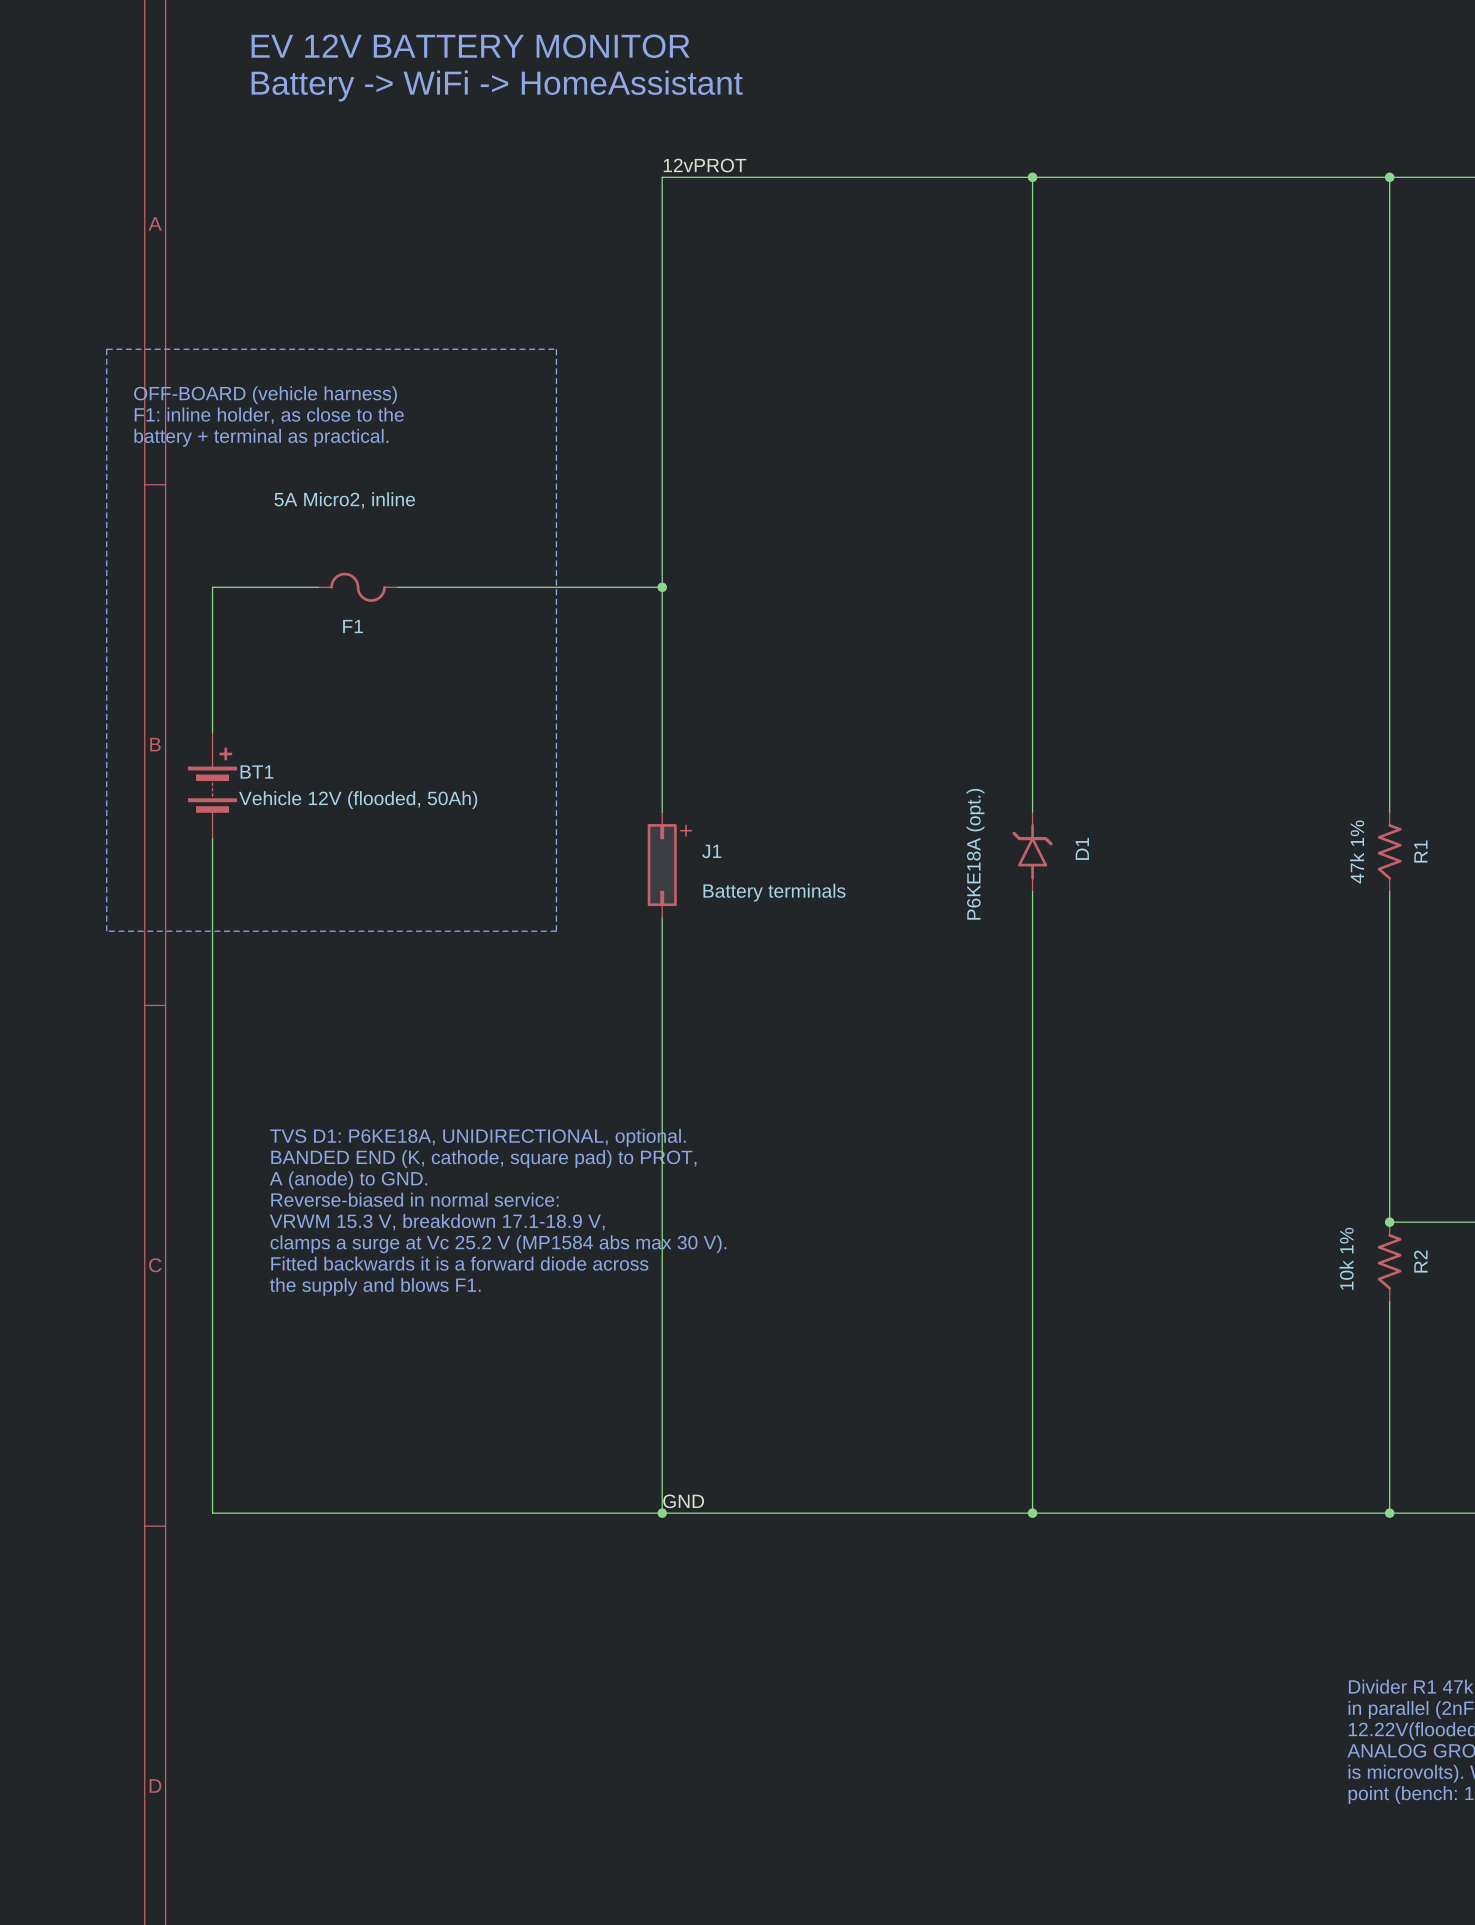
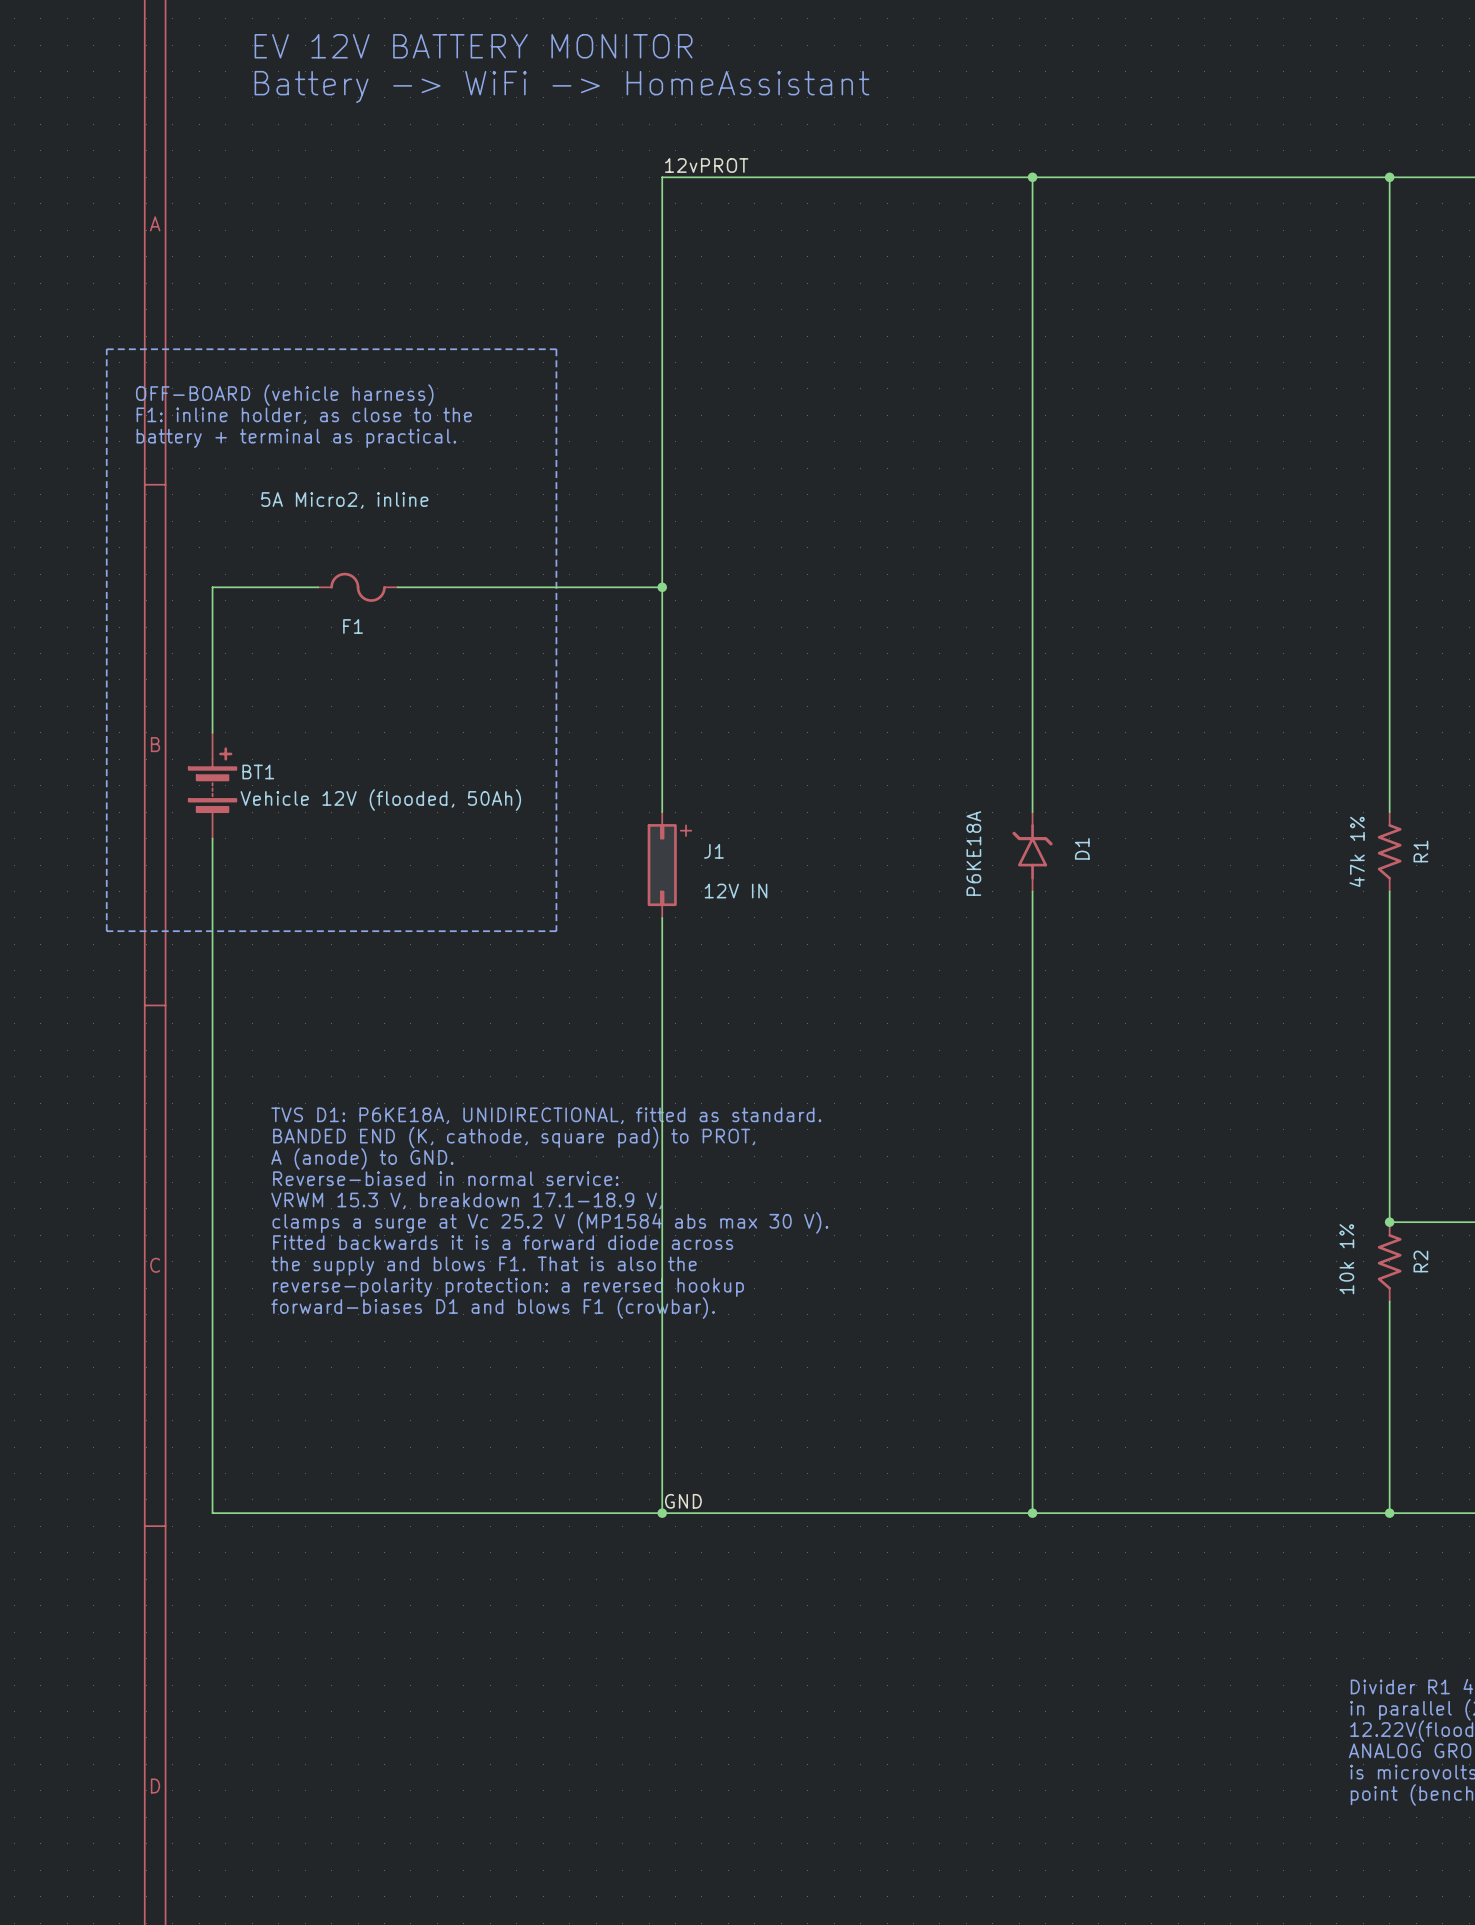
D1 value: P6KE18A (opt.) (975, 854) -> P6KE18A (973, 853)
J1 value: Battery terminals (774, 892) -> 12V IN (736, 891)
text: none -> TVS D1: P6KE18A, UNIDIRECTIONAL, fitted as standard. (546, 1115)
text: TVS D1: P6KE18A, UNIDIRECTIONAL, optional. (477, 1137) -> BANDED END (K, cathode, square pad) to PROT, (514, 1137)
text: BANDED END (K, cathode, square pad) to PROT, (483, 1159) -> A (anode) to GND. (362, 1158)
text: A (anode) to GND. (348, 1180) -> Reverse-biased in normal service: (445, 1178)
text: Reverse-biased in normal service: (414, 1199) -> VRWM 15.3 V, breakdown 17.1-18.9 V, (466, 1200)
text: VRWM 15.3 V, breakdown 17.1-18.9 V, (437, 1222) -> clamps a surge at Vc 25.2 V (MP1584 abs max 30 V). (550, 1222)
text: clamps a surge at Vc 25.2 V (MP1584 abs max 30 V). (498, 1244) -> Fitted backwards it is a forward diode across (503, 1242)
text: Fitted backwards it is a forward diode across (459, 1263) -> the supply and blows F1. That is also the (483, 1266)
text: the supply and blows F1. (375, 1286) -> reverse-polarity protection: a reversed hookup (508, 1287)
text: none -> forward-biases D1 and blows F1 (crowbar). (493, 1308)

